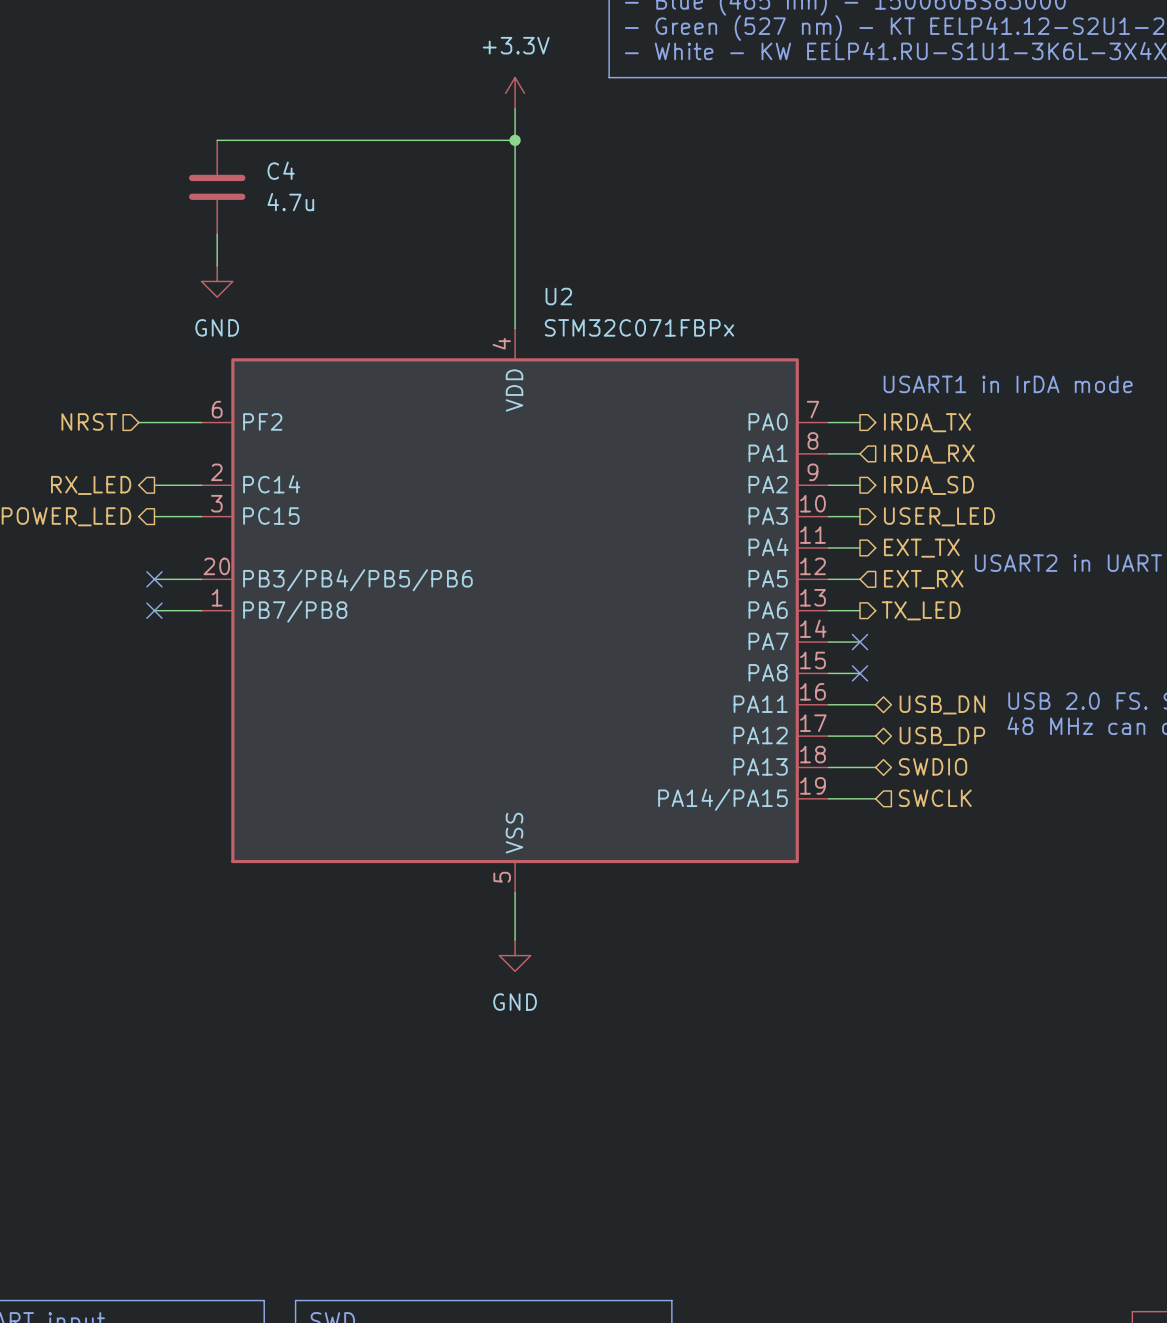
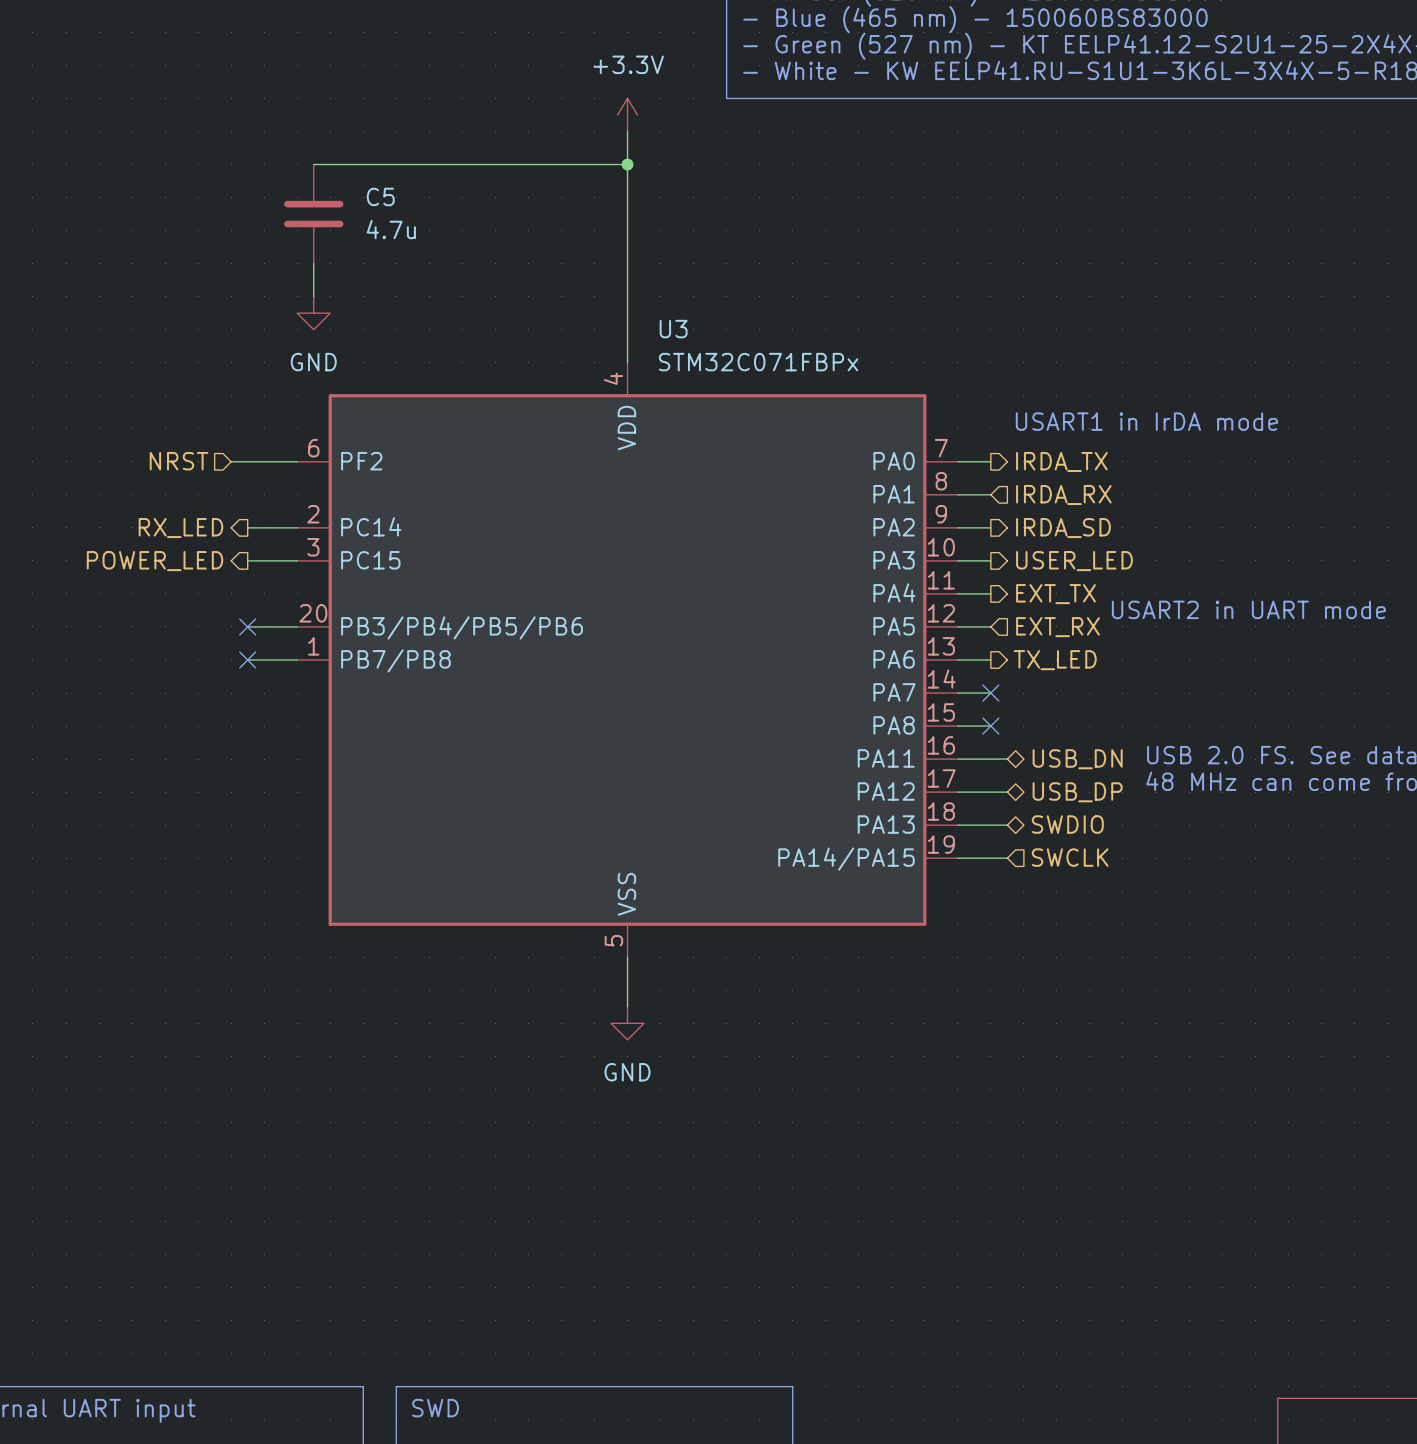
C4 name: C4 (281, 170) -> C5 (380, 196)
U2 name: U2 (558, 296) -> U3 (673, 329)

